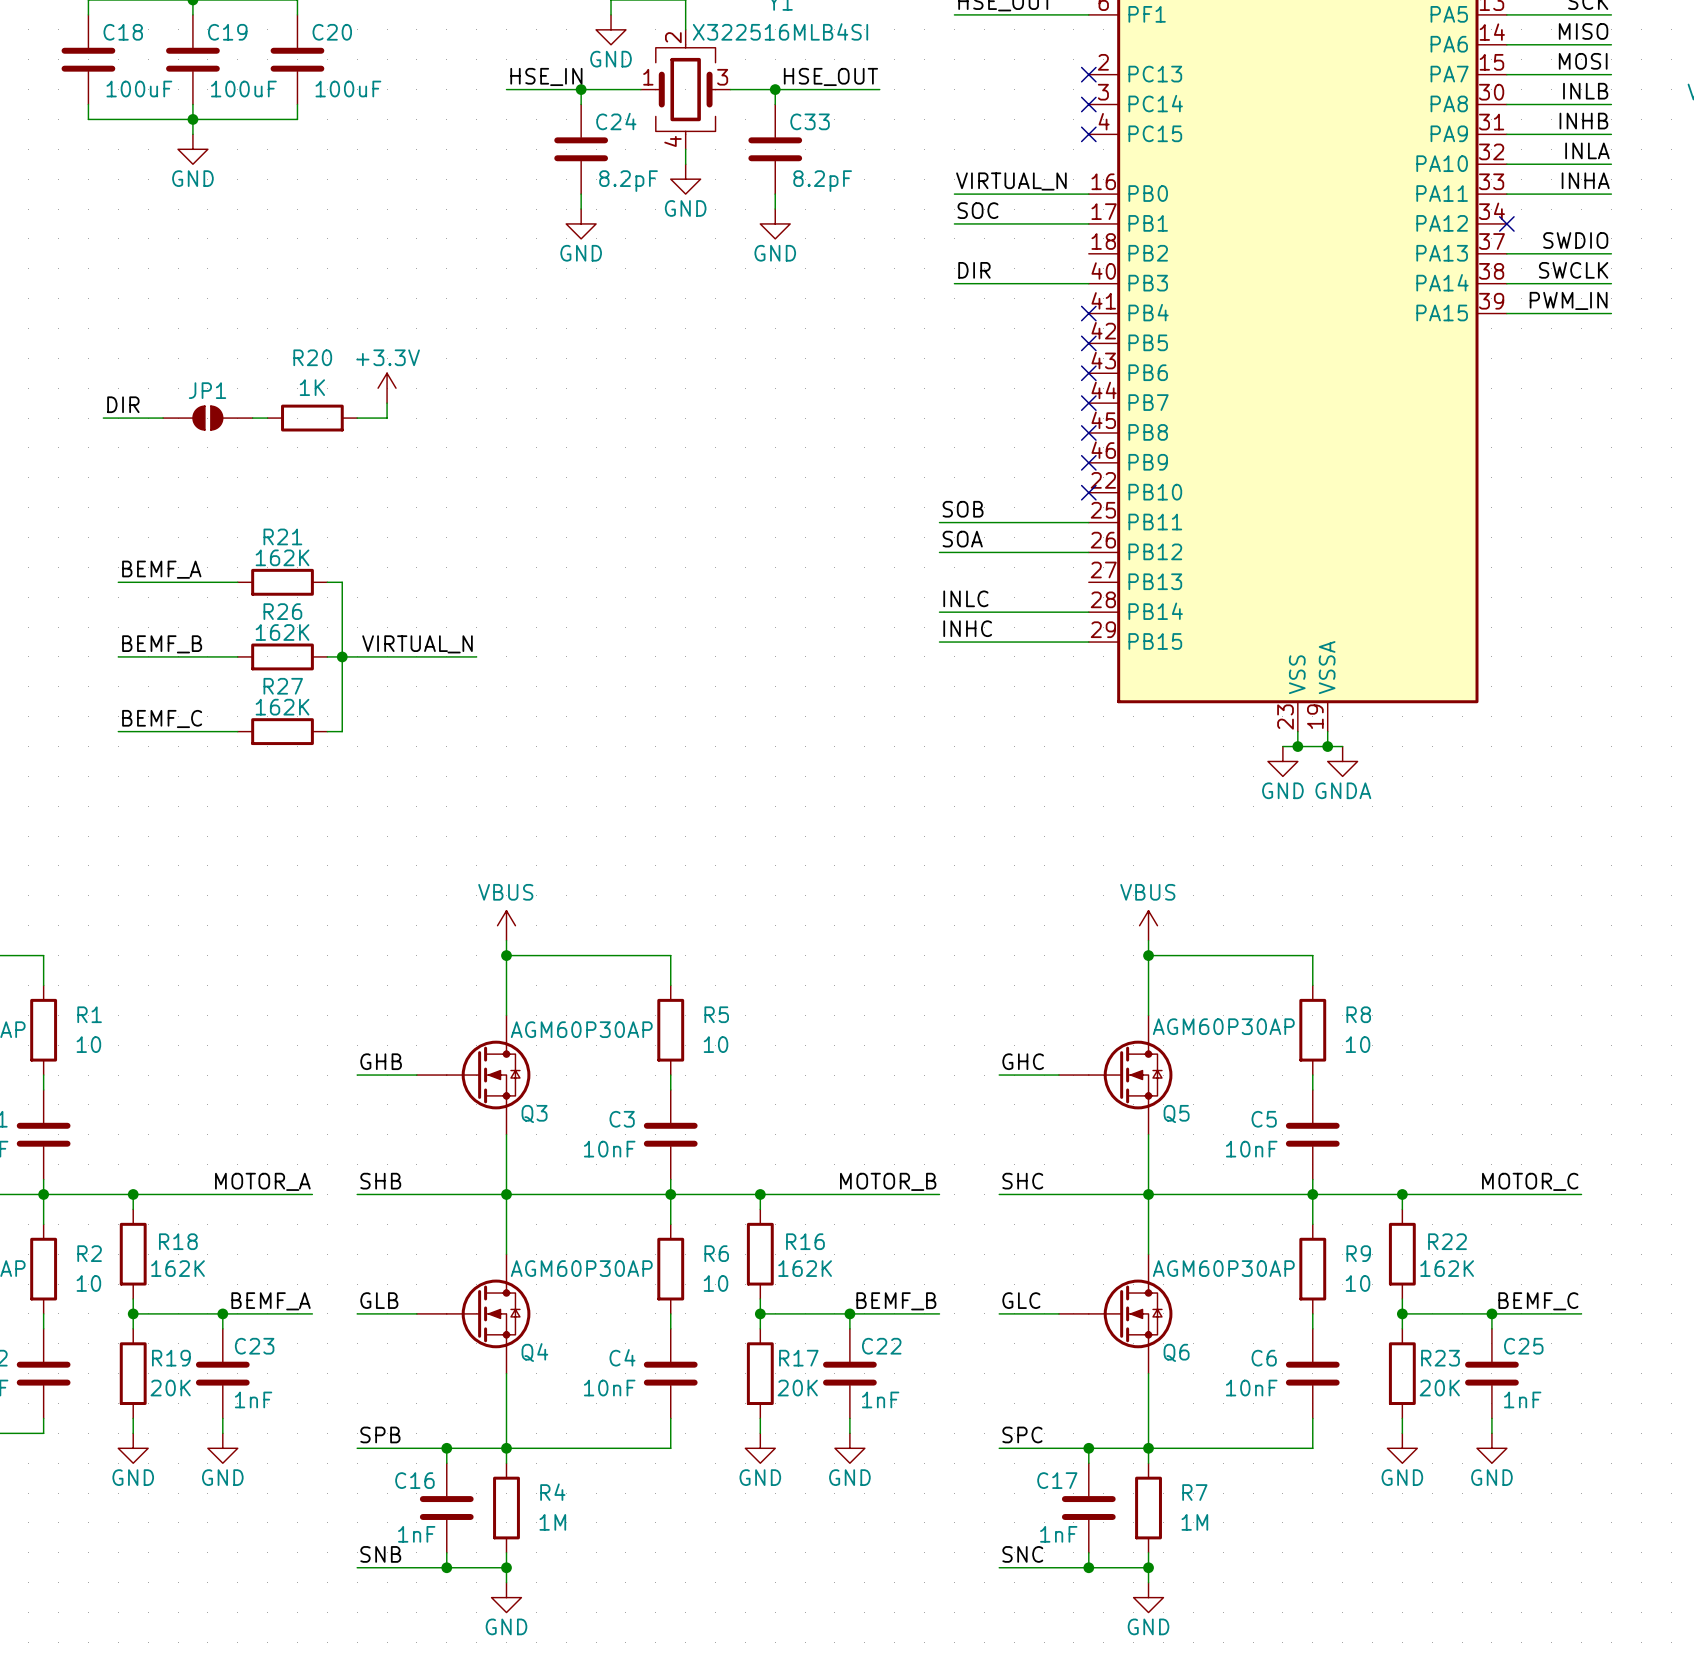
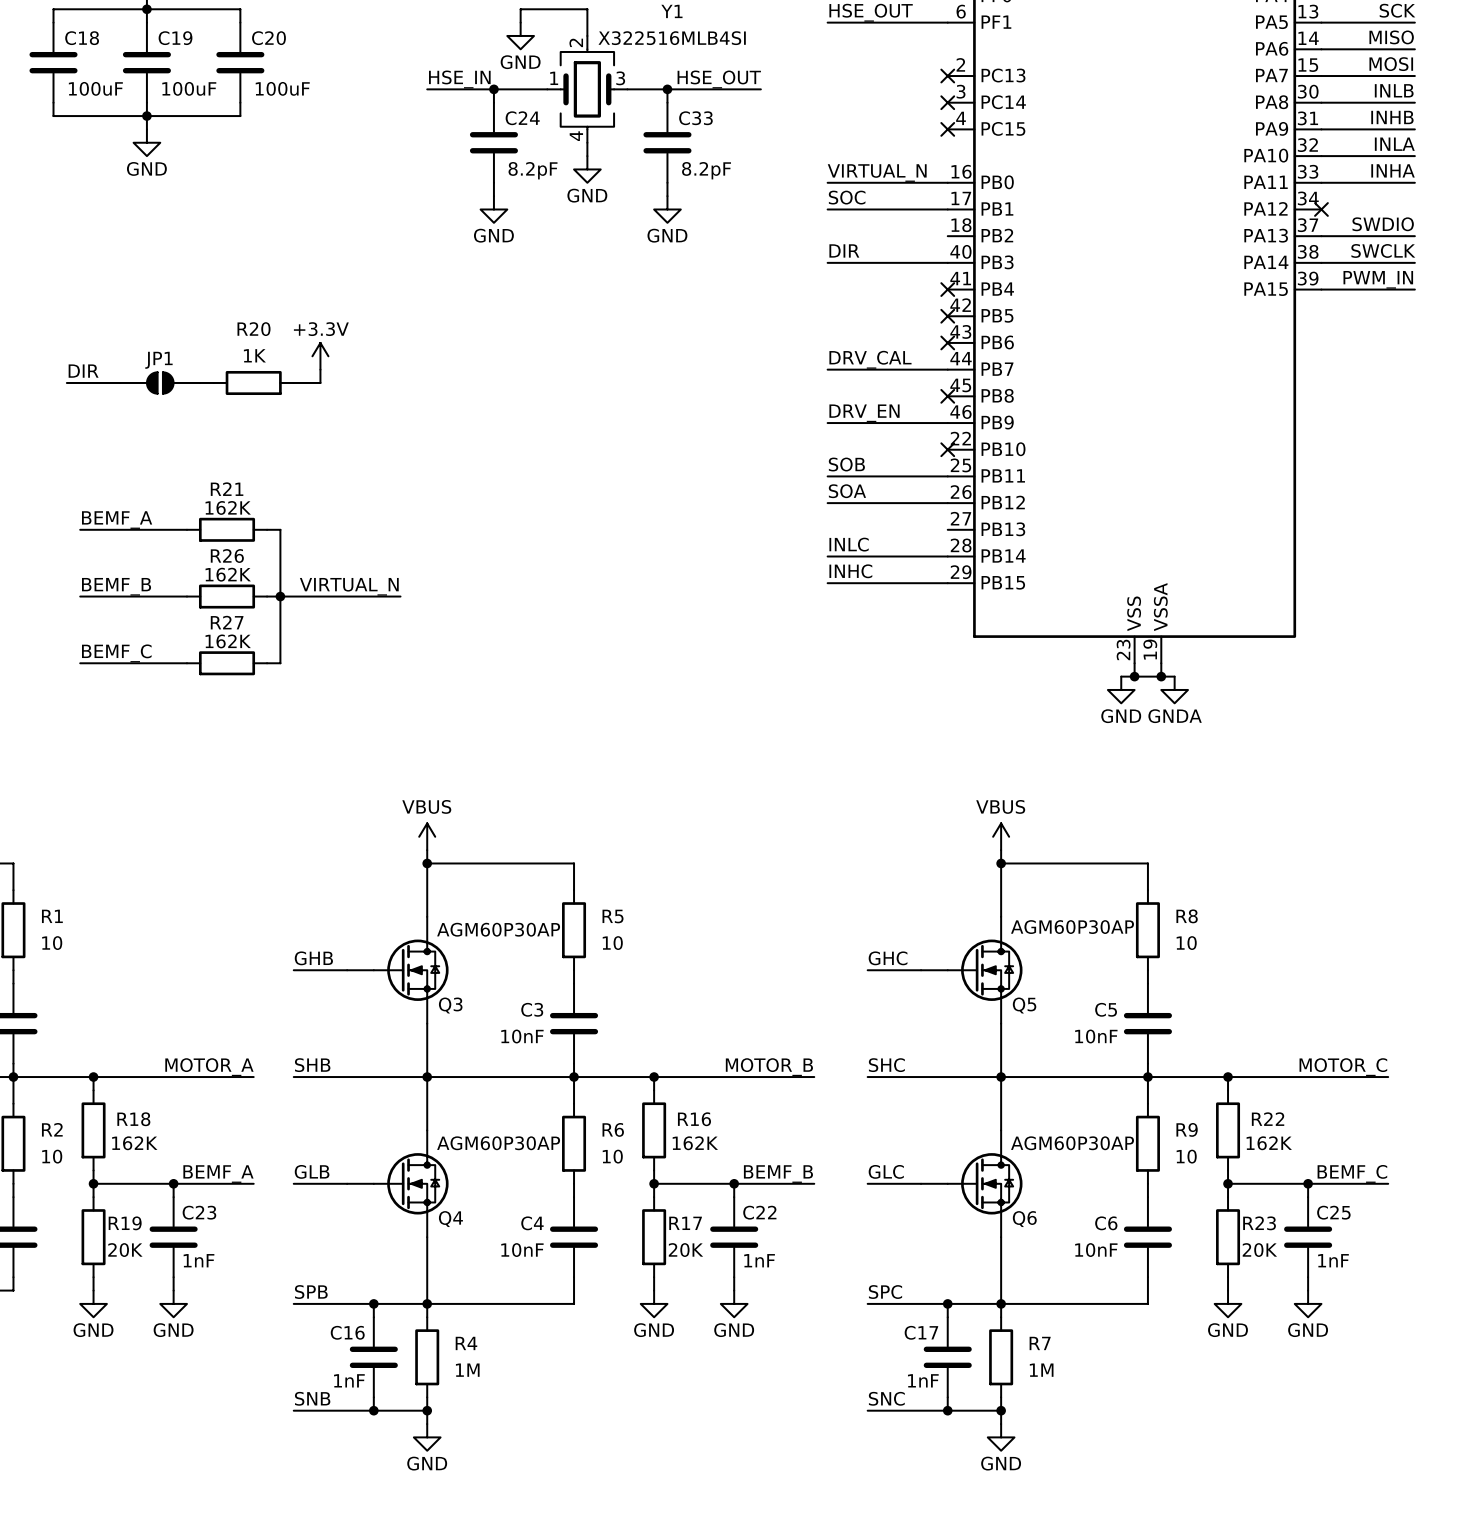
label: none -> DRV_CAL (870, 359)
wire: none -> (827, 369) (947, 369)
no-connect mark: (1088, 403) -> none
label: none -> DRV_EN (864, 413)
wire: none -> (827, 423) (947, 423)
no-connect mark: (1088, 462) -> none
label position: SOB (963, 509) -> SOB (846, 464)
wire: (939, 522) (954, 522) -> none
label position: SOA (962, 539) -> SOA (847, 491)
wire: (939, 552) (954, 552) -> none
label position: INLC (965, 598) -> INLC (849, 544)
wire: (939, 612) (954, 612) -> none
label position: INHC (967, 628) -> INHC (850, 571)
wire: (939, 642) (954, 642) -> none

